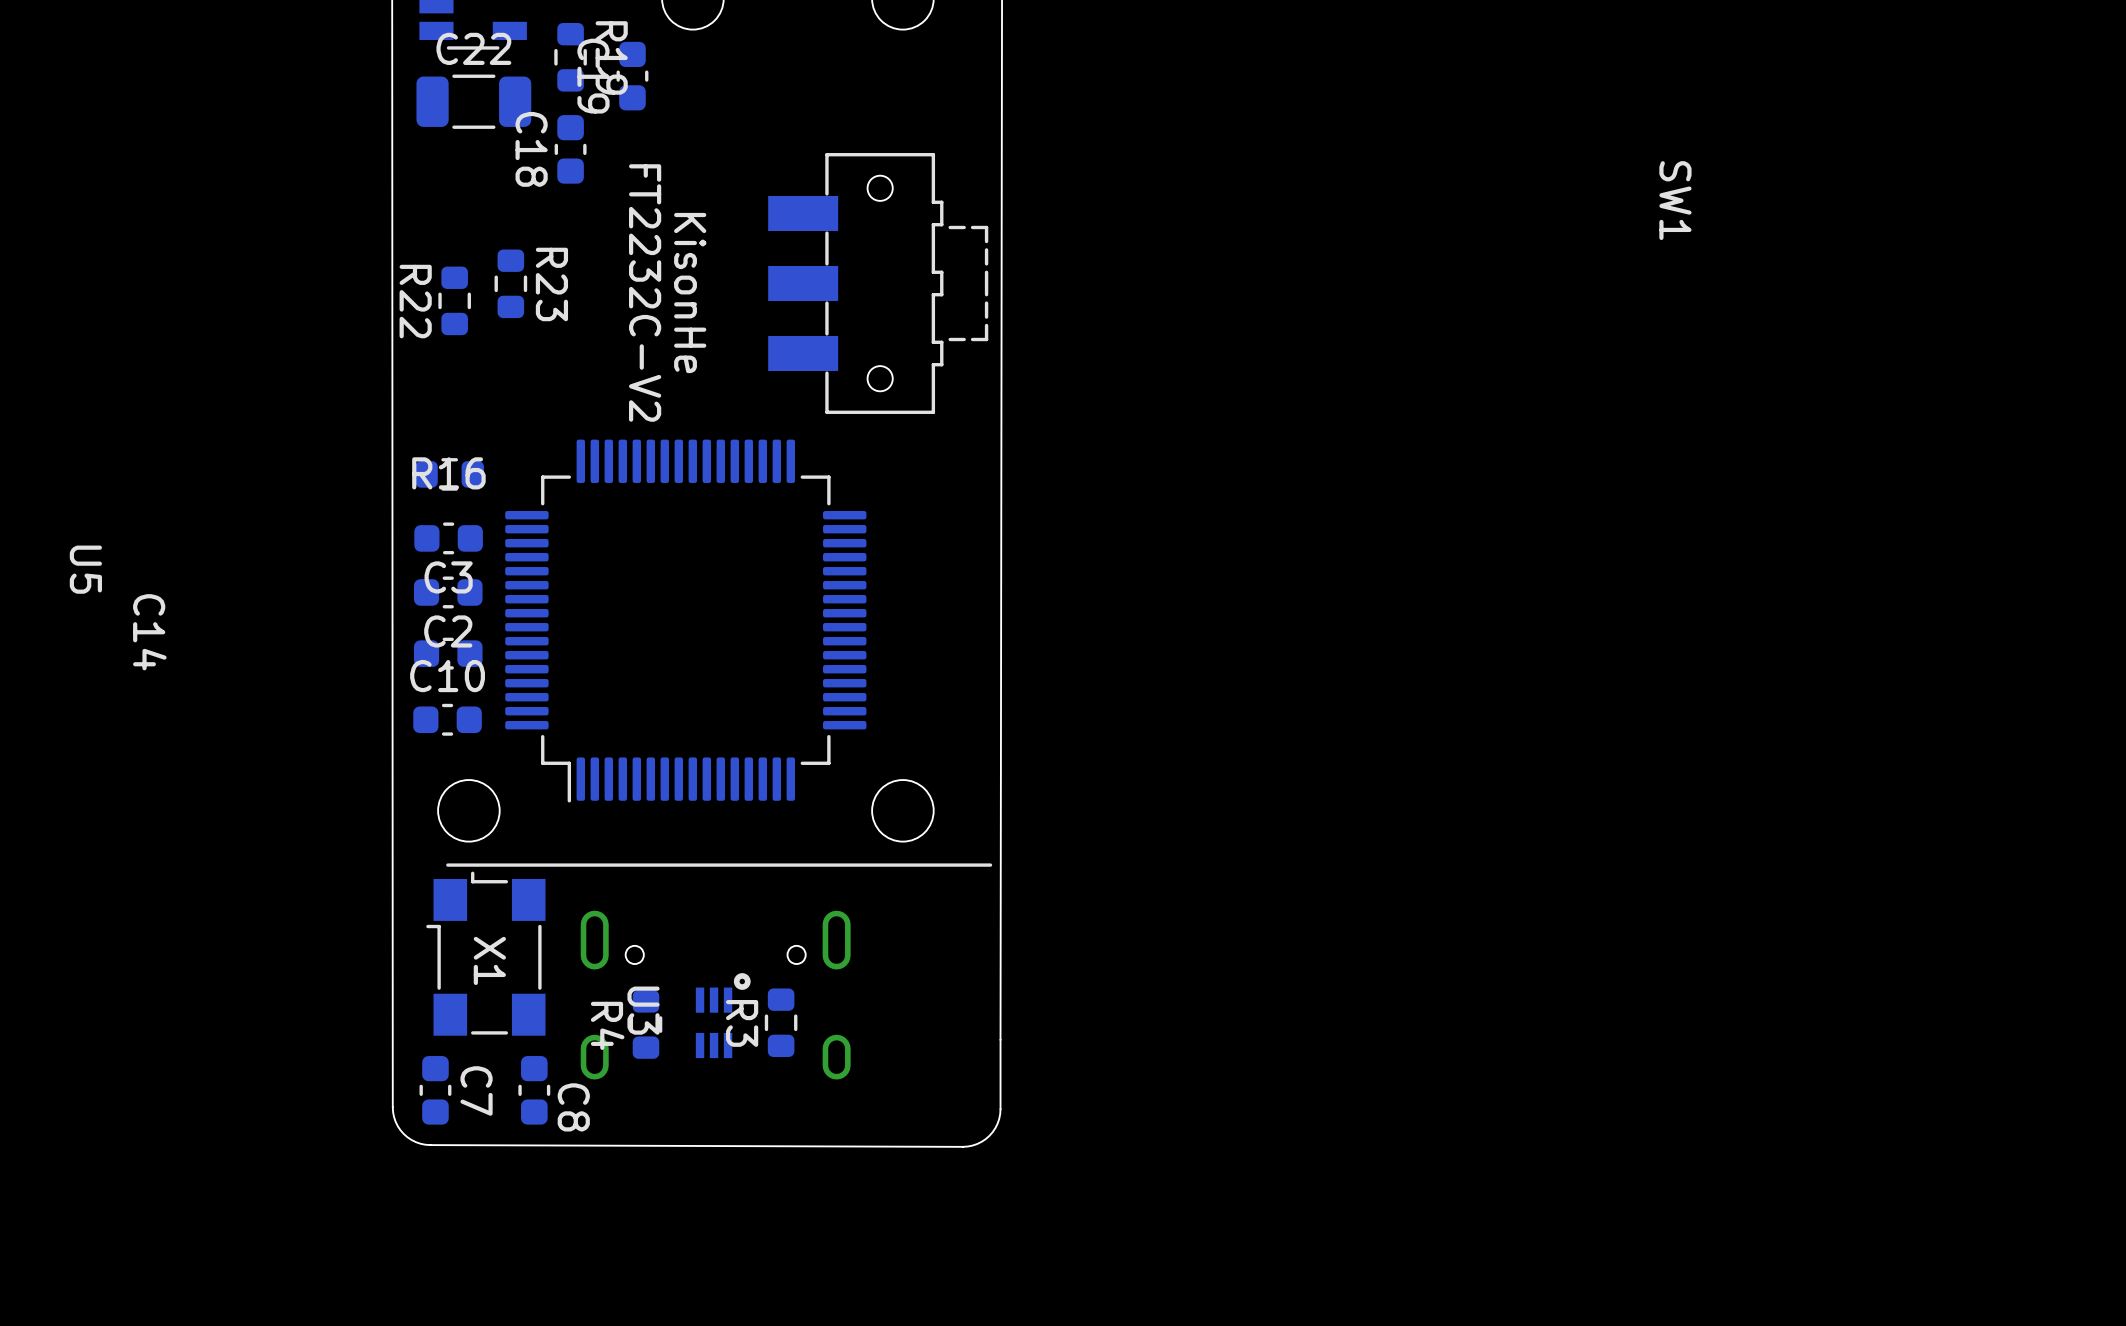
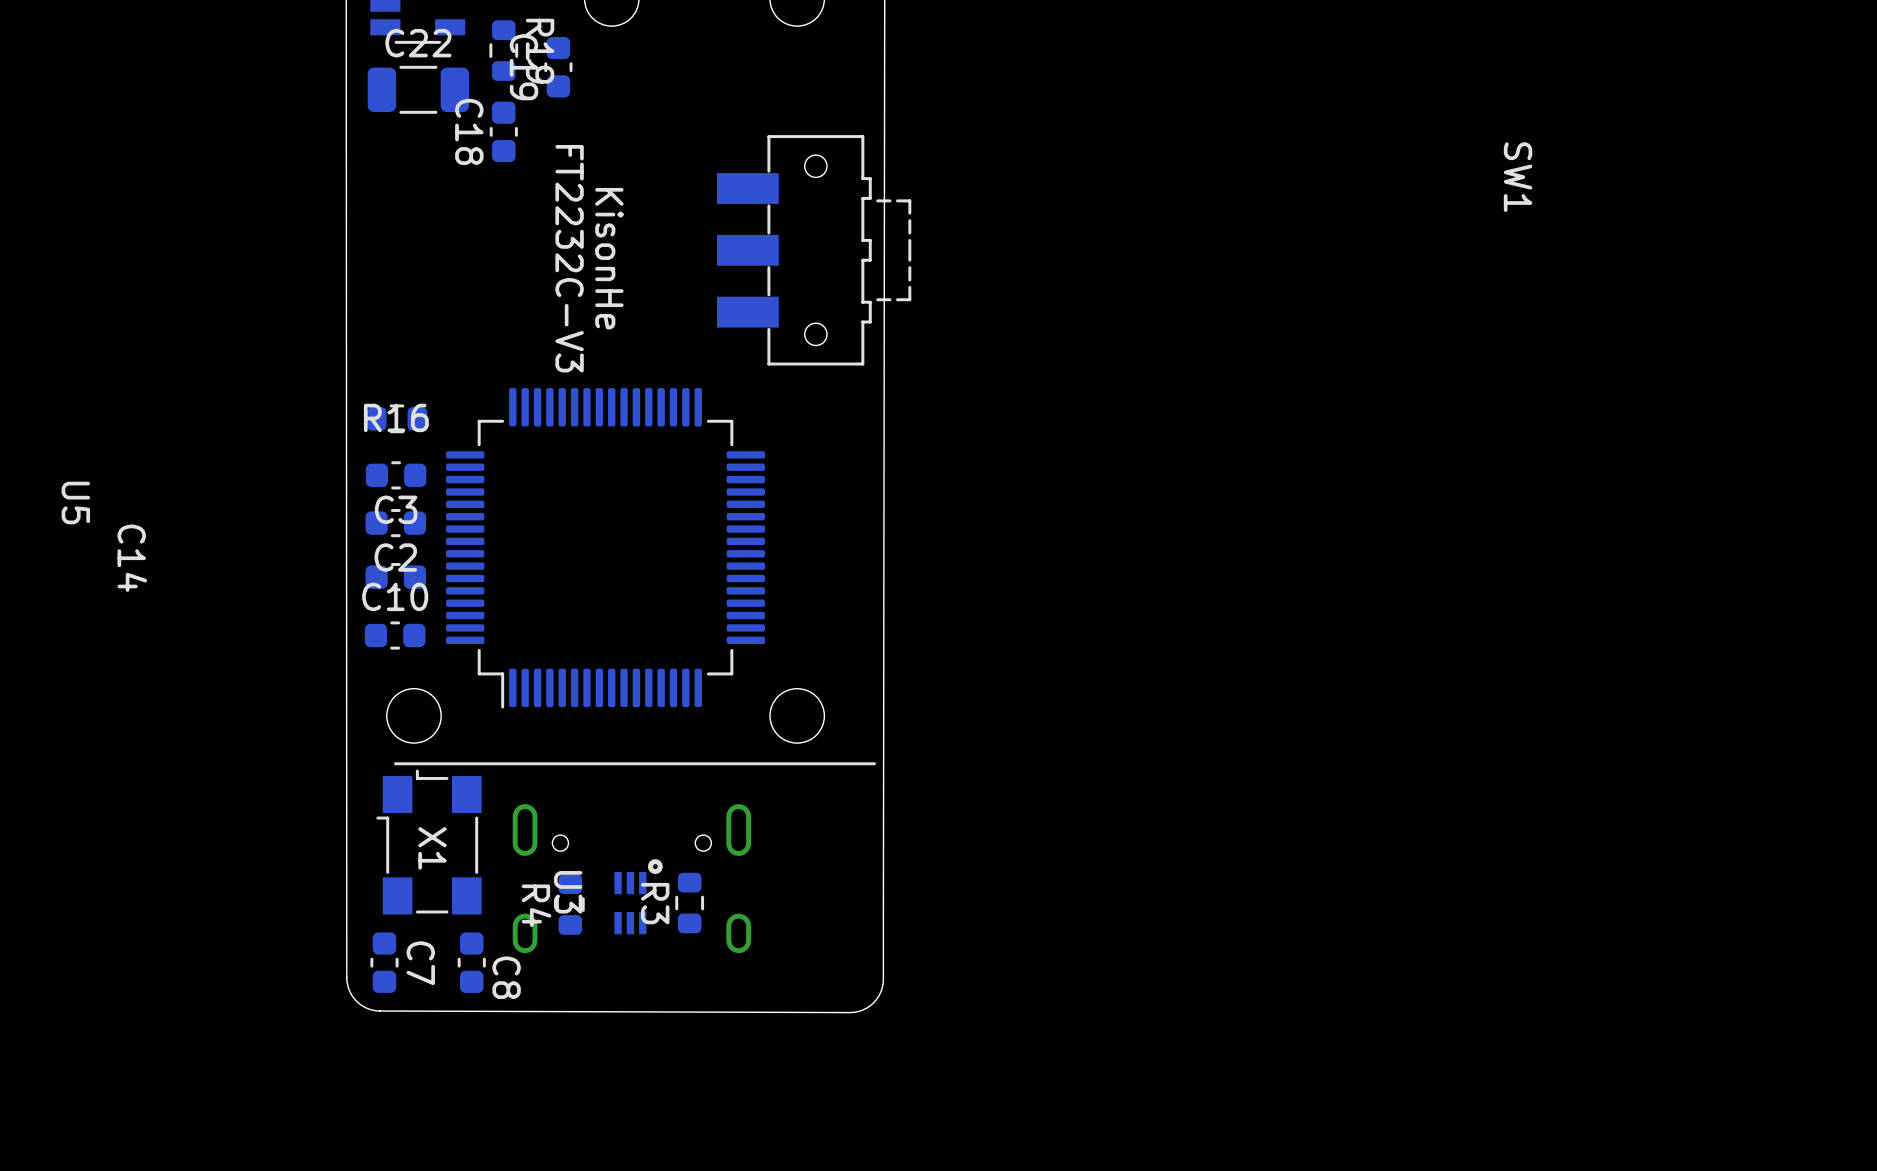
R23: (510, 283) -> none
SW1 position: (878, 283) -> (814, 250)
text: FT2232C-V2 (645, 293) -> FT2232C-V3 (569, 258)
R22: (454, 300) -> none

